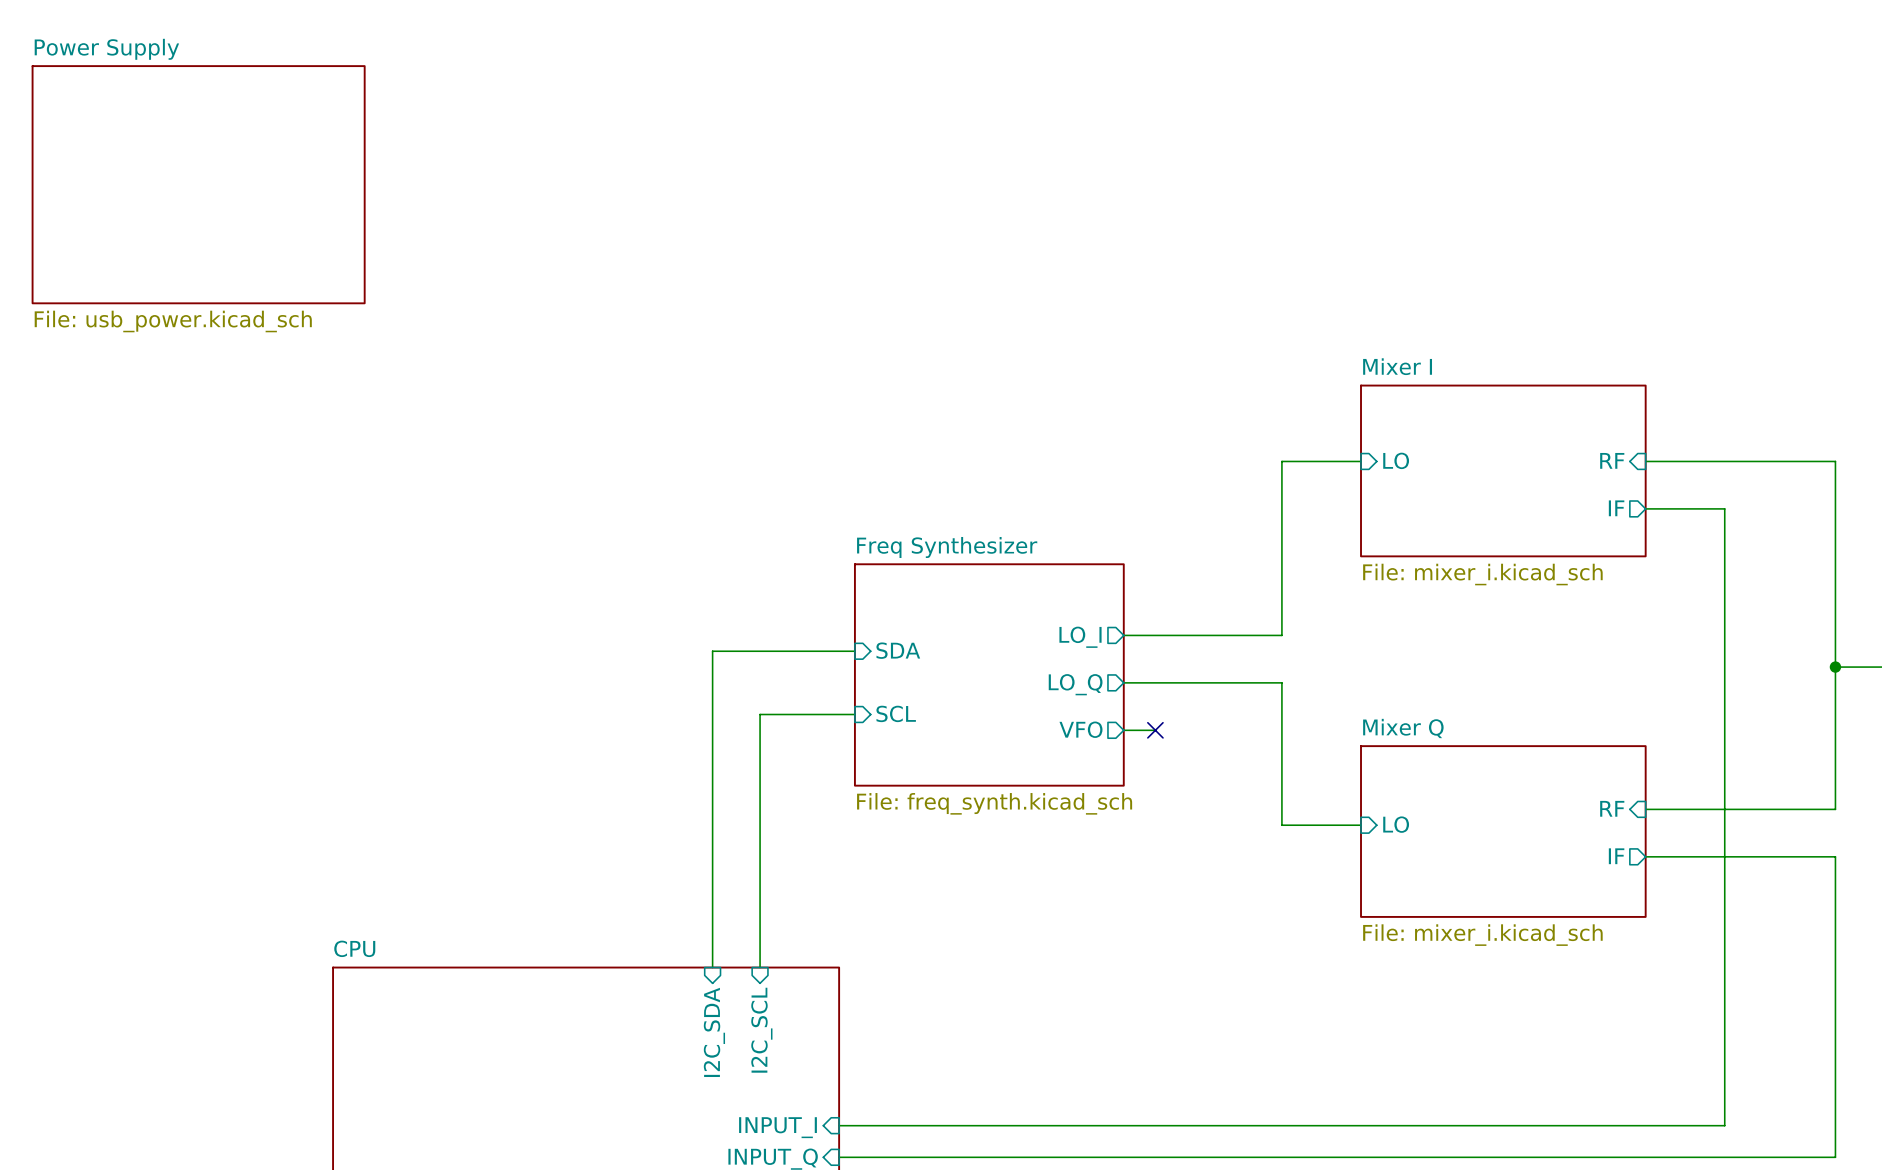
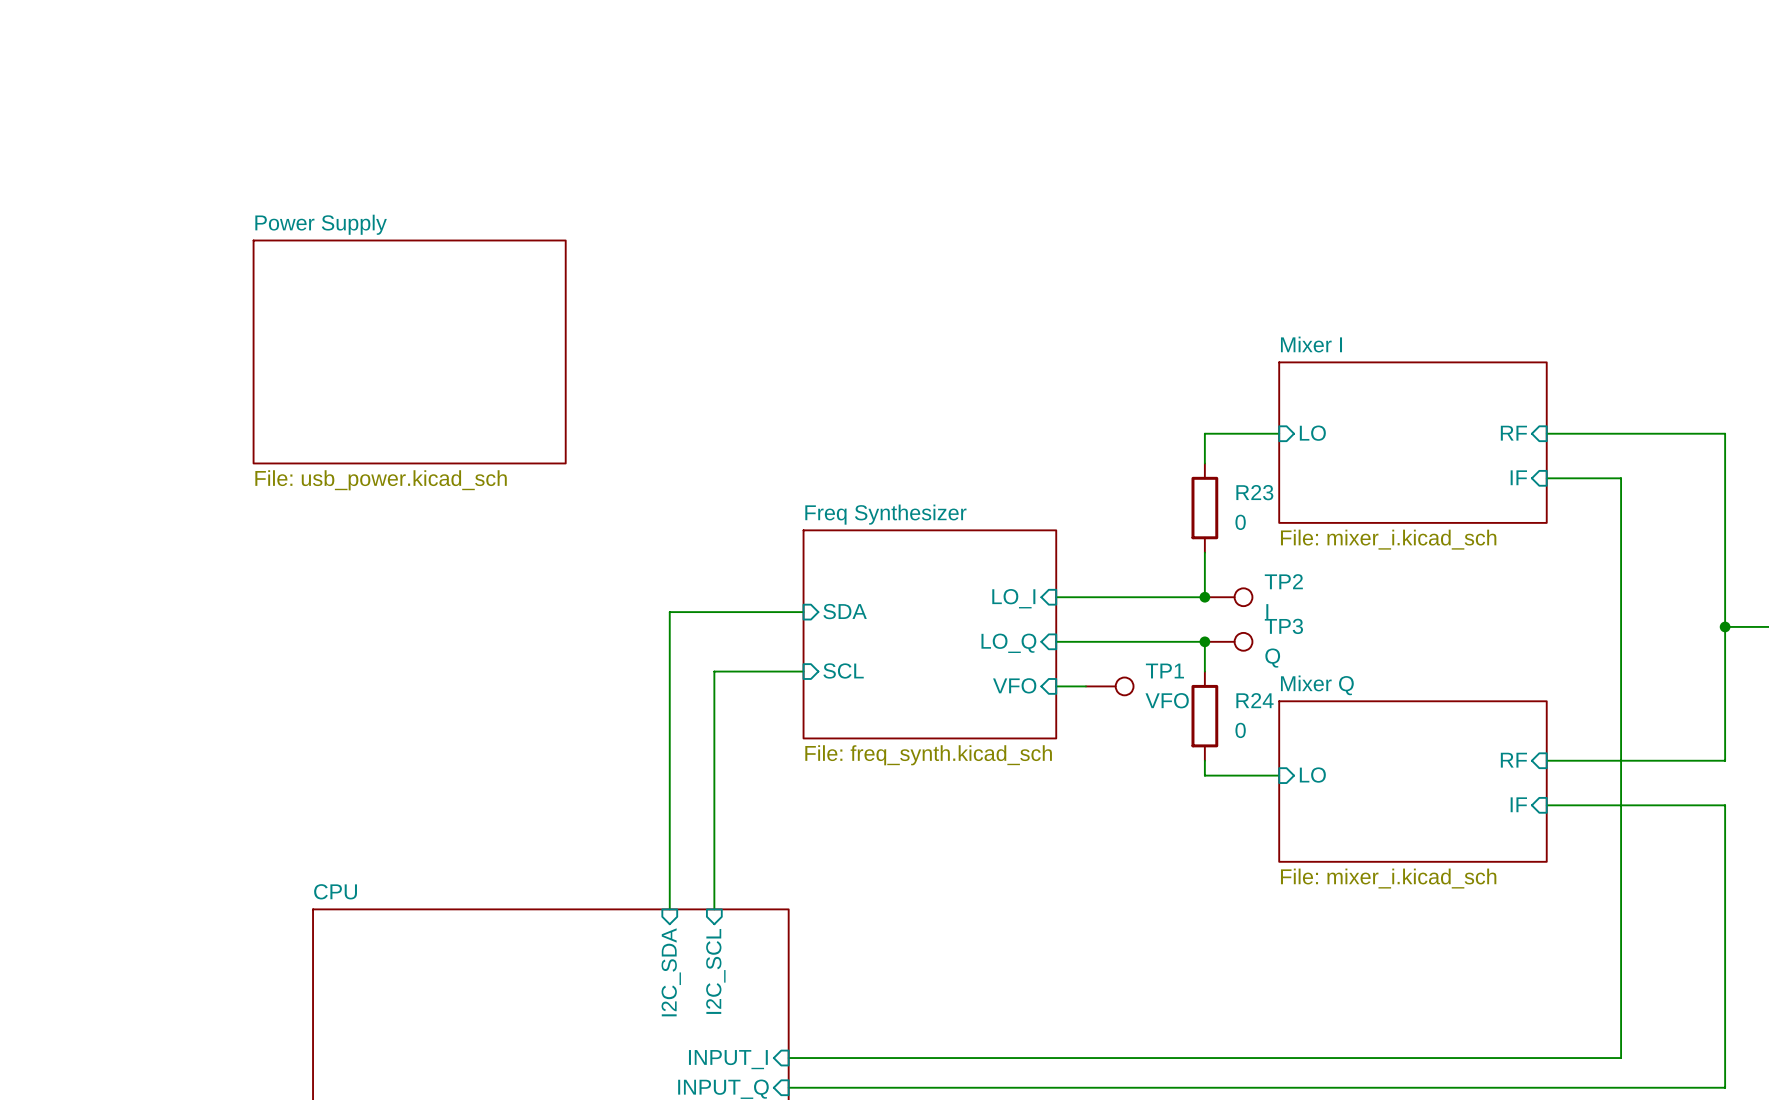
sheet Power Supply position: (198, 184) -> (409, 351)
wire: (1281, 493) (1281, 587) -> none
sheet pin shape: output (1616, 508) -> input (1518, 477)
R23: none -> 0 (1204, 508)
junction: none -> (1204, 597)
TP2: none -> I (1228, 597)
sheet pin shape: output (1080, 637) -> input (1013, 598)
junction: none -> (1204, 641)
TP3: none -> Q (1228, 641)
sheet pin shape: output (1075, 684) -> input (1008, 643)
wire: (1281, 714) (1281, 809) -> none
sheet pin shape: output (1080, 729) -> input (1014, 685)
no-connect mark: (1155, 730) -> none
TP1: none -> VFO (1109, 686)
R24: none -> 0 (1204, 716)
sheet pin shape: output (1616, 856) -> input (1518, 804)

